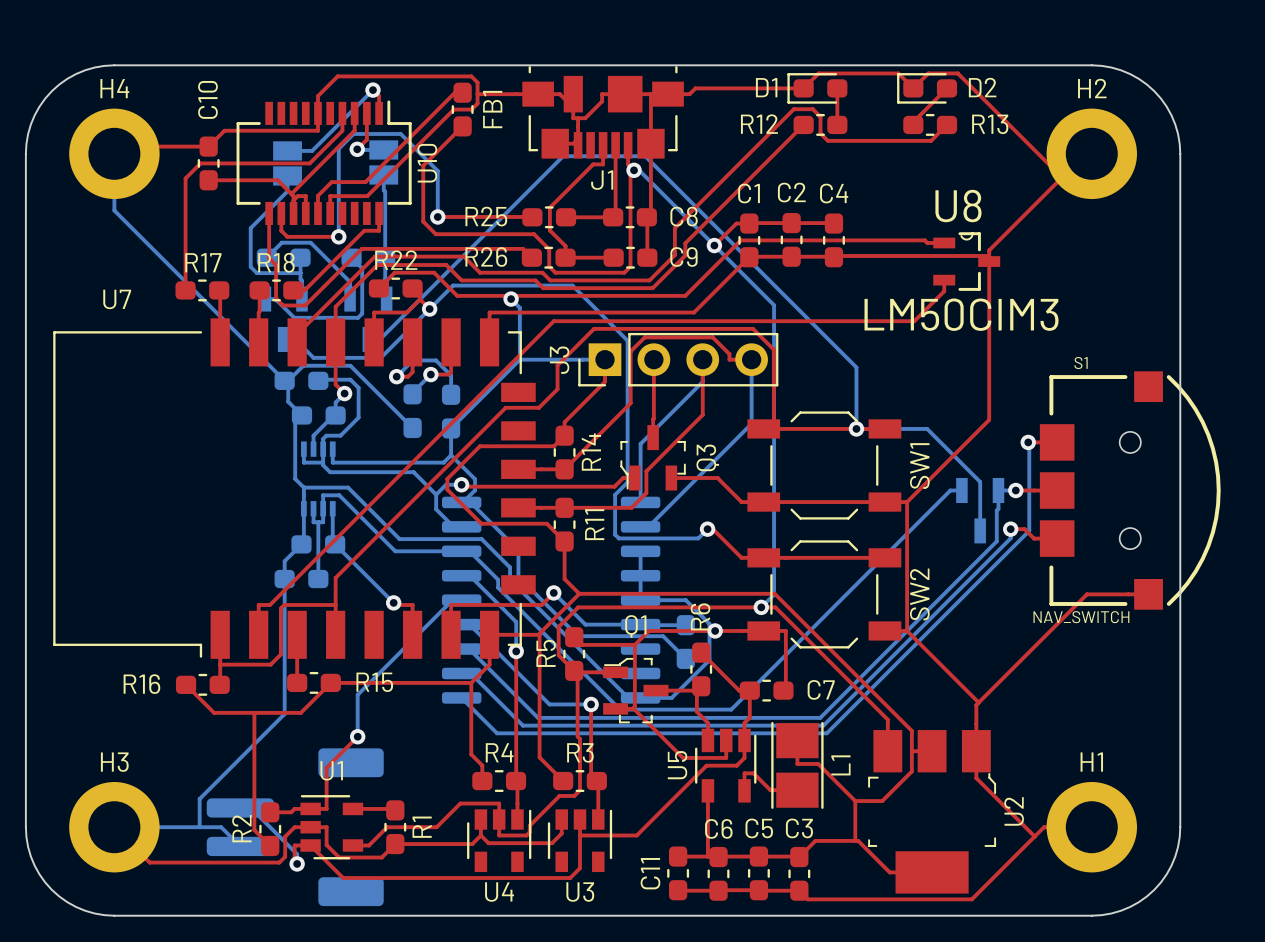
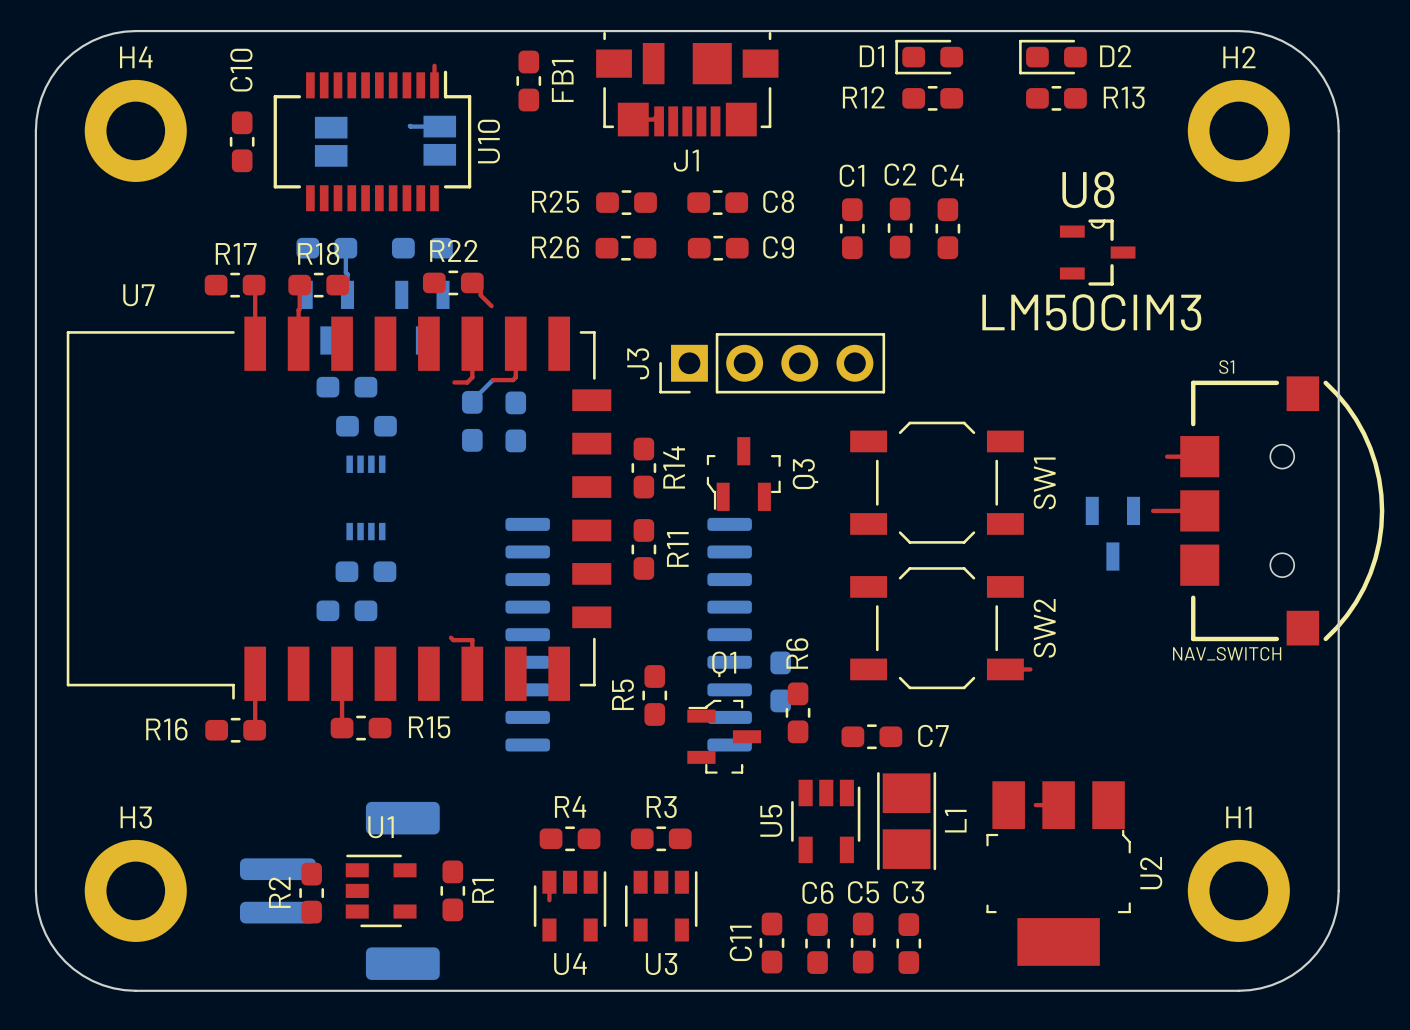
top track: (837, 88) (837, 124) -> none
top track: (947, 88) (913, 122) (913, 124) -> none
bottom track: (372, 90) (312, 150) (287, 150) -> none
via: (372, 90) -> none
top track: (462, 92) (454, 92) (365, 182) (331, 182) (318, 195) (318, 213) -> none
top track: (477, 94) (559, 94) (573, 106) -> none
top track: (573, 94) (573, 118) (585, 118) (602, 101) (602, 94) (689, 94) (695, 88) (803, 88) (818, 73) (898, 73) (913, 88) (928, 73) (957, 73) (1062, 177) -> none
top track: (650, 94) (650, 213) (646, 217) (647, 257) -> none
top track: (342, 113) (342, 130) (309, 163) (200, 163) (185, 178) (185, 290) -> none
top track: (354, 113) (354, 130) (291, 193) -> none
top track: (366, 113) (366, 139) (357, 149) -> none
top track: (578, 118) (578, 145) -> none
top track: (803, 124) (685, 243) (685, 255) (652, 288) (543, 288) (535, 280) (461, 280) (446, 265) (377, 265) (335, 306) (335, 384) (344, 393) -> none
top track: (947, 124) (931, 140) (827, 140) (820, 133) (820, 116) (812, 109) (793, 109) (674, 228) (674, 255) (649, 280) (550, 280) (542, 272) (480, 272) (463, 256) (374, 256) (297, 334) (297, 342) -> none
top track: (462, 126) (423, 165) (423, 221) (435, 234) (534, 234) (549, 249) (549, 266) (555, 272) (624, 272) (630, 266) (630, 173) (634, 170) (628, 164) (628, 145) -> none
top track: (603, 145) (603, 164) (593, 164) (549, 207) (549, 230) (565, 246) (565, 257) (613, 257) -> none
top track: (615, 145) (615, 214) (613, 217) (566, 217) -> none
via: (357, 149) -> none
bottom track: (114, 153) (114, 210) (284, 380) (288, 380) -> none
top track: (114, 153) (121, 146) (208, 146) (224, 130) (318, 130) (318, 96) (337, 76) (471, 76) (477, 82) (477, 103) (471, 109) (453, 109) (367, 196) (330, 196) (330, 213) -> none
top track: (1091, 153) (1080, 164) (1075, 164) (989, 250) (989, 419) (907, 502) -> none
bottom track: (634, 170) (639, 170) (774, 305) (774, 594) (761, 607) -> none
via: (634, 170) -> none
bottom track: (383, 174) (386, 299) -> none
bottom track: (287, 175) (287, 191) (250, 228) (250, 266) (256, 273) (300, 273) -> none
top track: (208, 180) (277, 180) (293, 196) (293, 213) -> none
top track: (293, 200) (297, 196) (305, 196) (305, 213) -> none
top track: (269, 213) (269, 258) (276, 265) (276, 298) (283, 305) (305, 305) (361, 248) (523, 248) (531, 257) -> none
top track: (281, 213) (281, 230) (287, 236) (338, 236) -> none
top track: (379, 213) (379, 230) (364, 230) (304, 290) (293, 290) -> none
bottom track: (437, 216) (437, 171) (400, 133) (353, 133) (338, 148) (338, 236) -> none
top track: (437, 216) (532, 217) -> none
via: (437, 216) -> none
top track: (833, 223) (736, 223) (714, 245) -> none
via: (338, 236) -> none
top track: (944, 242) (927, 242) (924, 240) (740, 240) (685, 295) (457, 295) (434, 272) (394, 272) (378, 288) -> none
via: (714, 245) -> none
top track: (989, 255) (749, 256) (694, 312) (489, 312) (489, 342) -> none
bottom track: (266, 257) (281, 242) (310, 242) (350, 280) (350, 299) -> none
bottom track: (351, 257) (362, 268) (362, 313) (358, 317) (294, 317) (276, 299) (265, 299) -> none
top track: (944, 280) (944, 291) (914, 321) (553, 321) (270, 604) (258, 604) (258, 634) -> none
top track: (420, 299) (406, 312) (374, 312) (374, 342) -> none
bottom track: (511, 299) (519, 307) (519, 359) -> none
via: (511, 299) -> none
via: (429, 309) -> none
bottom track: (283, 339) (295, 339) (313, 357) (380, 357) (453, 285) (572, 285) (627, 340) (627, 482) (615, 494) (615, 534) (618, 538) (698, 538) (707, 529) -> none
bottom track: (368, 339) (379, 339) (563, 156) (645, 156) (856, 367) (856, 428) (927, 428) (980, 481) (980, 530) -> none
bottom track: (519, 359) (451, 428) (451, 455) -> none
bottom track: (519, 359) (605, 359) -> none
top track: (605, 359) (605, 381) (564, 422) (564, 435) (554, 446) (479, 446) (447, 478) (447, 489) (481, 523) (546, 523) (564, 541) (564, 579) (579, 593) -> none
top track: (653, 359) (653, 437) -> none
bottom track: (702, 359) (702, 381) (640, 443) (640, 502) -> none
top track: (702, 359) (702, 414) (646, 471) (646, 493) (631, 507) (518, 507) -> none
bottom track: (751, 359) (751, 423) (648, 526) (640, 526) -> none
top track: (751, 359) (729, 359) (729, 354) (712, 337) (644, 337) (630, 351) (630, 403) (564, 469) (518, 469) -> none
via: (430, 374) -> none
bottom track: (396, 376) (412, 360) (435, 360) (451, 375) (451, 394) -> none
via: (396, 376) -> none
bottom track: (288, 380) (288, 401) (301, 415) (295, 422) (295, 478) (303, 487) -> none
bottom track: (288, 380) (303, 365) (350, 365) (412, 427) -> none
bottom track: (318, 380) (350, 379) (358, 387) (358, 417) (340, 435) (326, 435) (323, 438) (323, 465) (330, 472) (413, 472) (436, 494) -> none
bottom track: (344, 393) (335, 402) (335, 415) (313, 435) (313, 449) -> none
via: (344, 393) -> none
top track: (763, 428) (884, 428) -> none
top track: (773, 428) (773, 349) (753, 328) (594, 328) (557, 365) (557, 389) (538, 407) (505, 407) (335, 577) (335, 634) -> none
via: (856, 428) -> none
bottom track: (1028, 442) (1029, 530) (826, 733) (497, 733) (461, 697) -> none
via: (1028, 442) -> none
bottom track: (303, 449) (303, 462) (323, 462) -> none
bottom track: (332, 449) (332, 462) (443, 462) (451, 455) -> none
bottom track: (451, 455) (475, 479) (475, 490) (461, 502) -> none
top track: (634, 478) (623, 478) (614, 486) (463, 486) (461, 484) -> none
top track: (671, 478) (717, 478) (741, 502) (907, 502) -> none
bottom track: (461, 484) (446, 484) (436, 494) -> none
via: (461, 484) -> none
bottom track: (303, 487) (348, 487) (399, 539) (481, 539) (510, 567) (510, 579) (628, 697) (671, 697) (709, 660) (709, 623) (685, 600) (640, 600) (640, 551) -> none
bottom track: (303, 487) (303, 541) (284, 561) (284, 713) (199, 799) (199, 827) -> none
bottom track: (961, 490) (950, 490) (731, 709) (620, 709) (498, 587) (498, 579) (469, 551) (395, 551) (339, 495) (323, 495) (323, 522) (313, 522) (313, 508) -> none
bottom track: (1015, 490) (998, 490) (996, 541) (820, 717) (538, 717) (469, 649) (461, 649) -> none
via: (1015, 490) -> none
bottom track: (436, 494) (436, 509) (453, 526) (461, 526) -> none
bottom track: (466, 498) (518, 550) (518, 576) (577, 636) (663, 636) (685, 658) -> none
top track: (907, 502) (907, 630) (978, 702) -> none
bottom track: (332, 508) (332, 541) (393, 602) -> none
bottom track: (318, 522) (318, 579) -> none
top track: (707, 529) (712, 529) (741, 557) (884, 557) -> none
via: (707, 529) -> none
bottom track: (1010, 529) (1010, 538) (823, 725) (522, 725) (470, 673) (461, 673) -> none
top track: (1010, 529) (1024, 529) (1034, 538) (1057, 538) -> none
via: (1010, 529) -> none
bottom track: (461, 575) (469, 575) (516, 622) (516, 651) -> none
bottom track: (553, 592) (585, 624) (685, 625) -> none
top track: (553, 592) (541, 604) (451, 604) (451, 634) -> none
via: (553, 592) -> none
top track: (579, 593) (774, 593) (911, 730) (911, 771) (882, 801) (855, 801) -> none
top track: (579, 593) (539, 633) (539, 757) (563, 781) -> none
top track: (1148, 594) (1086, 594) (976, 704) (976, 778) (1034, 836) -> none
bottom track: (461, 600) (452, 600) (357, 694) (357, 736) -> none
via: (393, 602) -> none
top track: (335, 604) (284, 604) (280, 608) (280, 654) (270, 664) (220, 664) -> none
via: (761, 607) -> none
bottom track: (461, 624) (469, 624) (549, 704) (591, 704) -> none
via: (715, 630) -> none
top track: (539, 634) (489, 634) (489, 664) (471, 682) -> none
top track: (574, 637) (581, 644) (634, 644) -> none
top track: (634, 644) (648, 630) (785, 630) (785, 688) (783, 690) -> none
top track: (634, 644) (634, 706) (632, 708) -> none
top track: (516, 651) (517, 819) -> none
via: (516, 651) -> none
top track: (701, 652) (739, 690) (749, 690) (749, 717) (744, 722) (744, 757) (736, 765) (706, 765) (636, 835) (580, 835) -> none
top track: (577, 672) (580, 790) (574, 795) (559, 795) (529, 825) (529, 832) (526, 835) (499, 835) (499, 803) (460, 803) (436, 827) (387, 827) (368, 845) (352, 845) -> none
top track: (615, 672) (575, 672) (558, 655) (558, 626) (578, 607) (775, 607) (887, 719) (887, 751) -> none
top track: (471, 682) (471, 754) (482, 765) (482, 781) -> none
top track: (471, 682) (330, 682) (300, 712) (214, 712) (186, 684) -> none
top track: (656, 690) (696, 690) -> none
top track: (696, 690) (696, 711) (707, 722) (707, 740) -> none
top track: (591, 704) (591, 775) (598, 782) (598, 819) -> none
via: (591, 704) -> none
top track: (615, 708) (633, 708) (682, 757) (726, 757) (726, 740) -> none
top track: (254, 712) (254, 830) (270, 845) -> none
top track: (357, 736) (326, 767) (326, 808) (294, 808) (291, 812) (270, 812) -> none
via: (357, 736) -> none
top track: (797, 740) (797, 763) (818, 763) (855, 801) -> none
top track: (707, 790) (707, 856) -> none
top track: (797, 790) (770, 790) (753, 773) (744, 773) (744, 790) -> none
top track: (855, 801) (855, 840) -> none
bottom track: (240, 807) (250, 807) (297, 854) (297, 863) -> none
top track: (352, 808) (395, 810) -> none
top track: (561, 819) (561, 833) (552, 843) (488, 843) (480, 835) (472, 844) (395, 844) (381, 857) (339, 857) (326, 845) (326, 827) (294, 827) (285, 836) (285, 856) (279, 862) (149, 862) (114, 827) -> none
top track: (580, 819) (580, 868) (570, 878) (343, 878) (310, 845) (294, 845) (294, 861) (297, 863) -> none
bottom track: (114, 827) (221, 827) (240, 846) -> none
top track: (1091, 827) (1044, 827) (971, 899) (808, 899) (799, 890) (678, 890) -> none
top track: (678, 856) (799, 857) (815, 840) (858, 840) (889, 872) (932, 872) -> none
via: (297, 863) -> none

